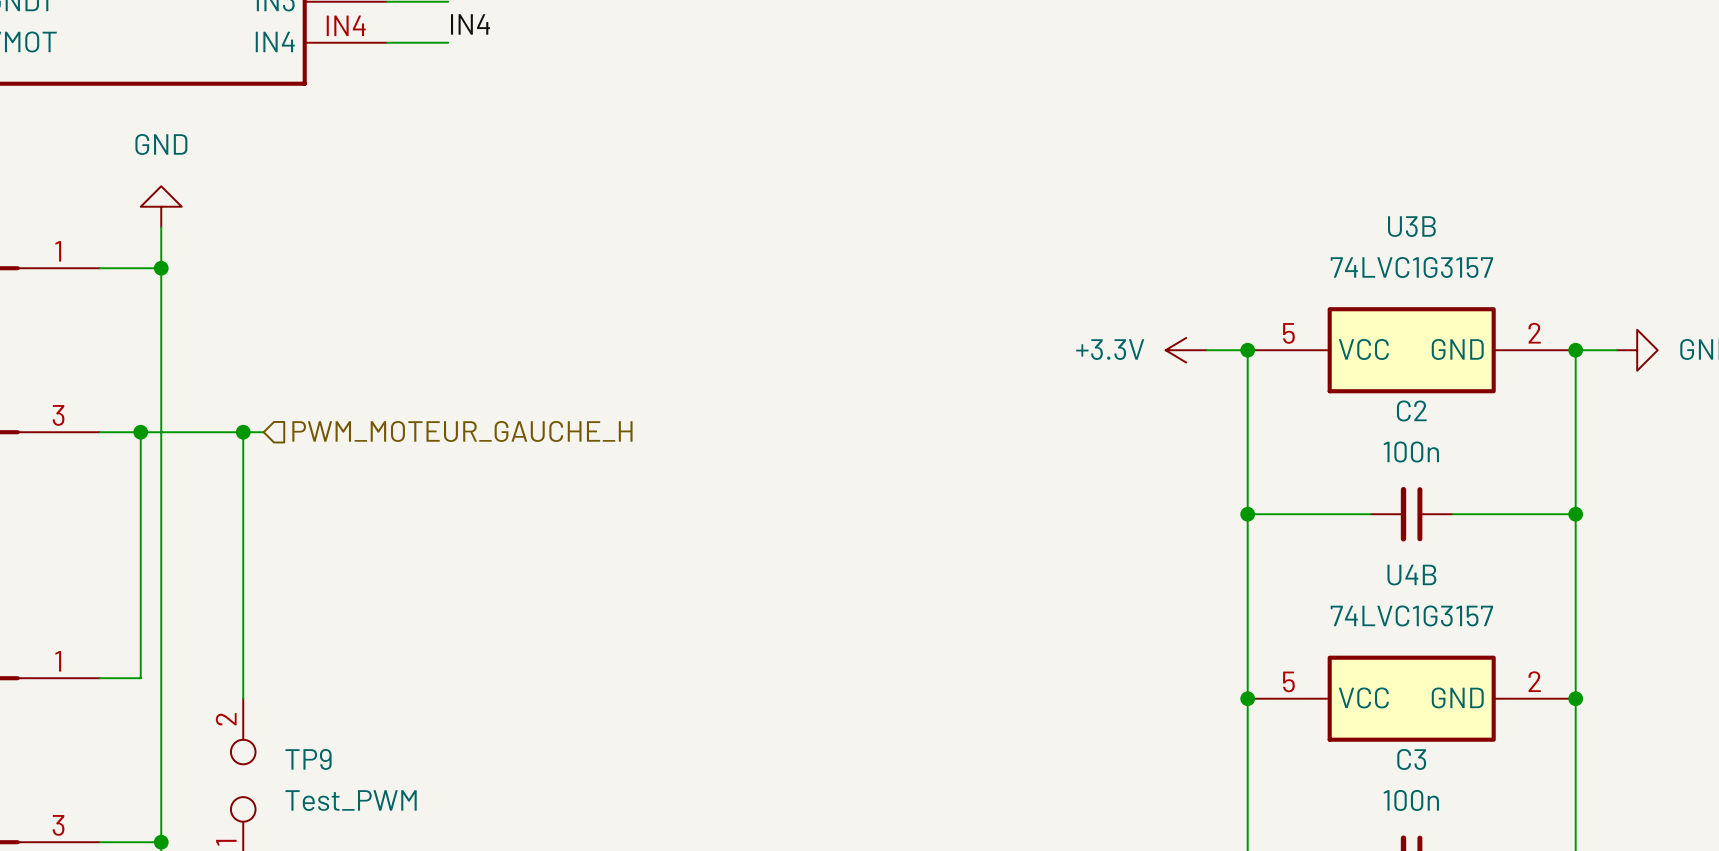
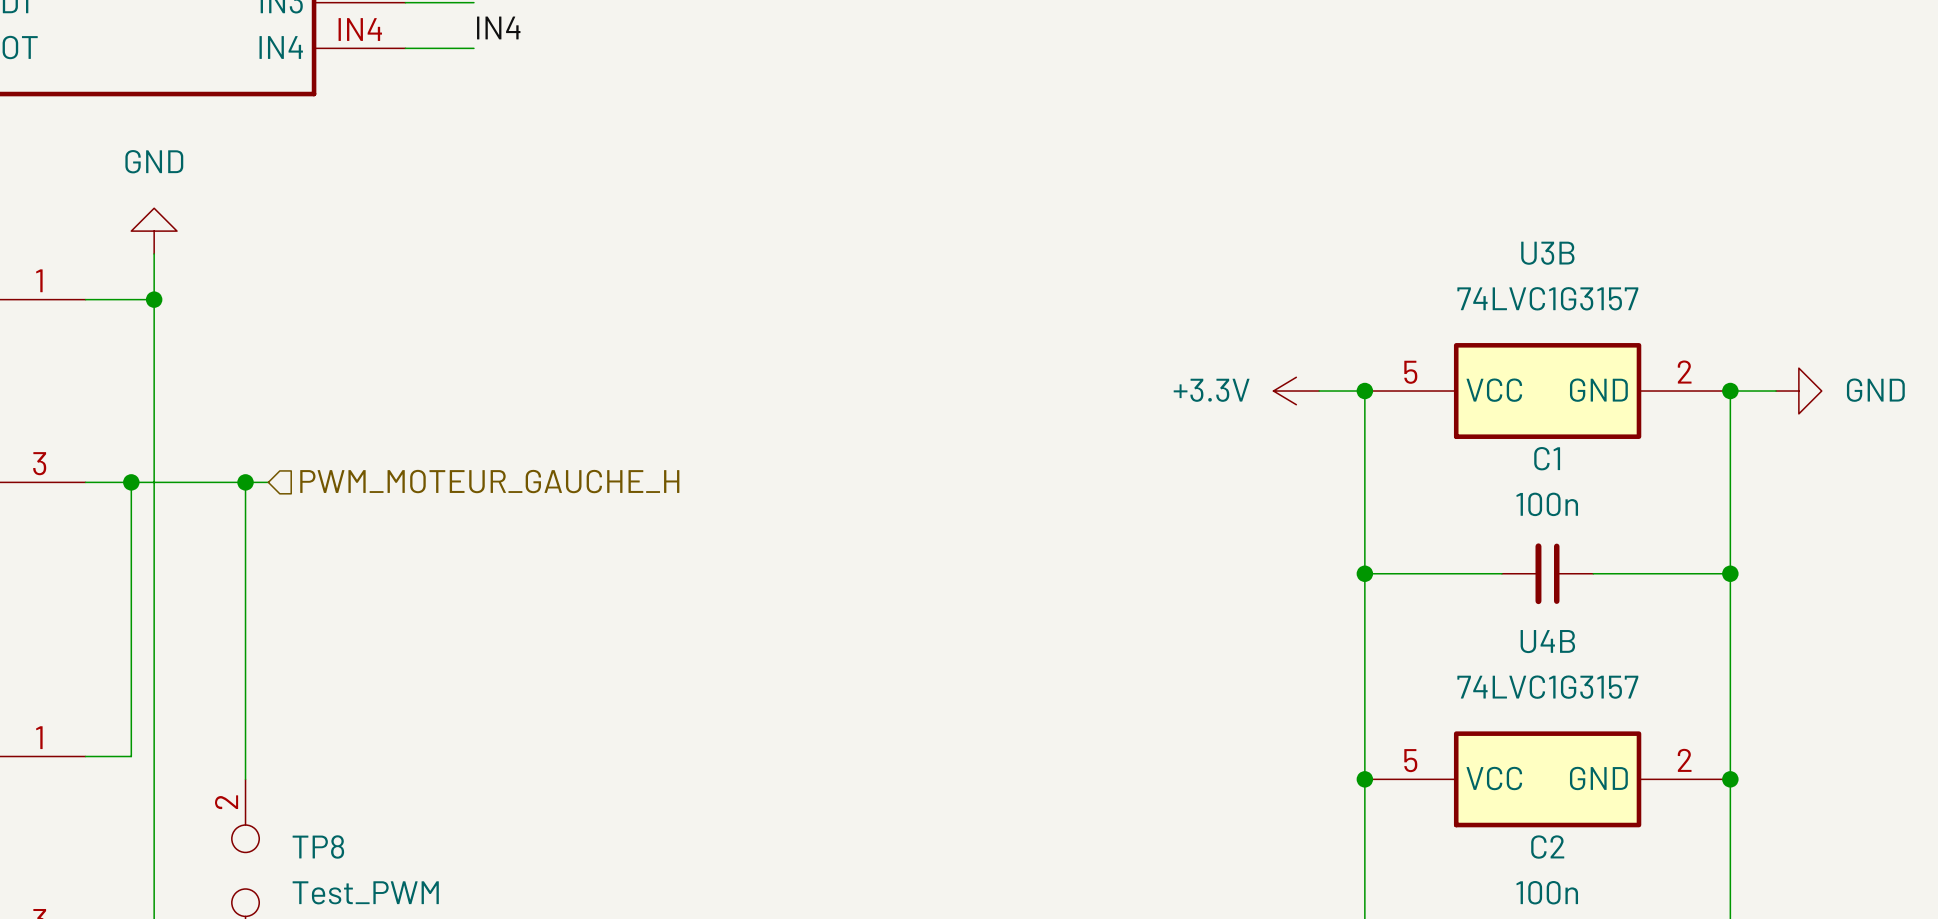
C2 name: C2 (1411, 410) -> C1 (1547, 458)
TP9 name: TP9 (308, 759) -> TP8 (318, 846)
C3 name: C3 (1411, 759) -> C2 (1547, 847)

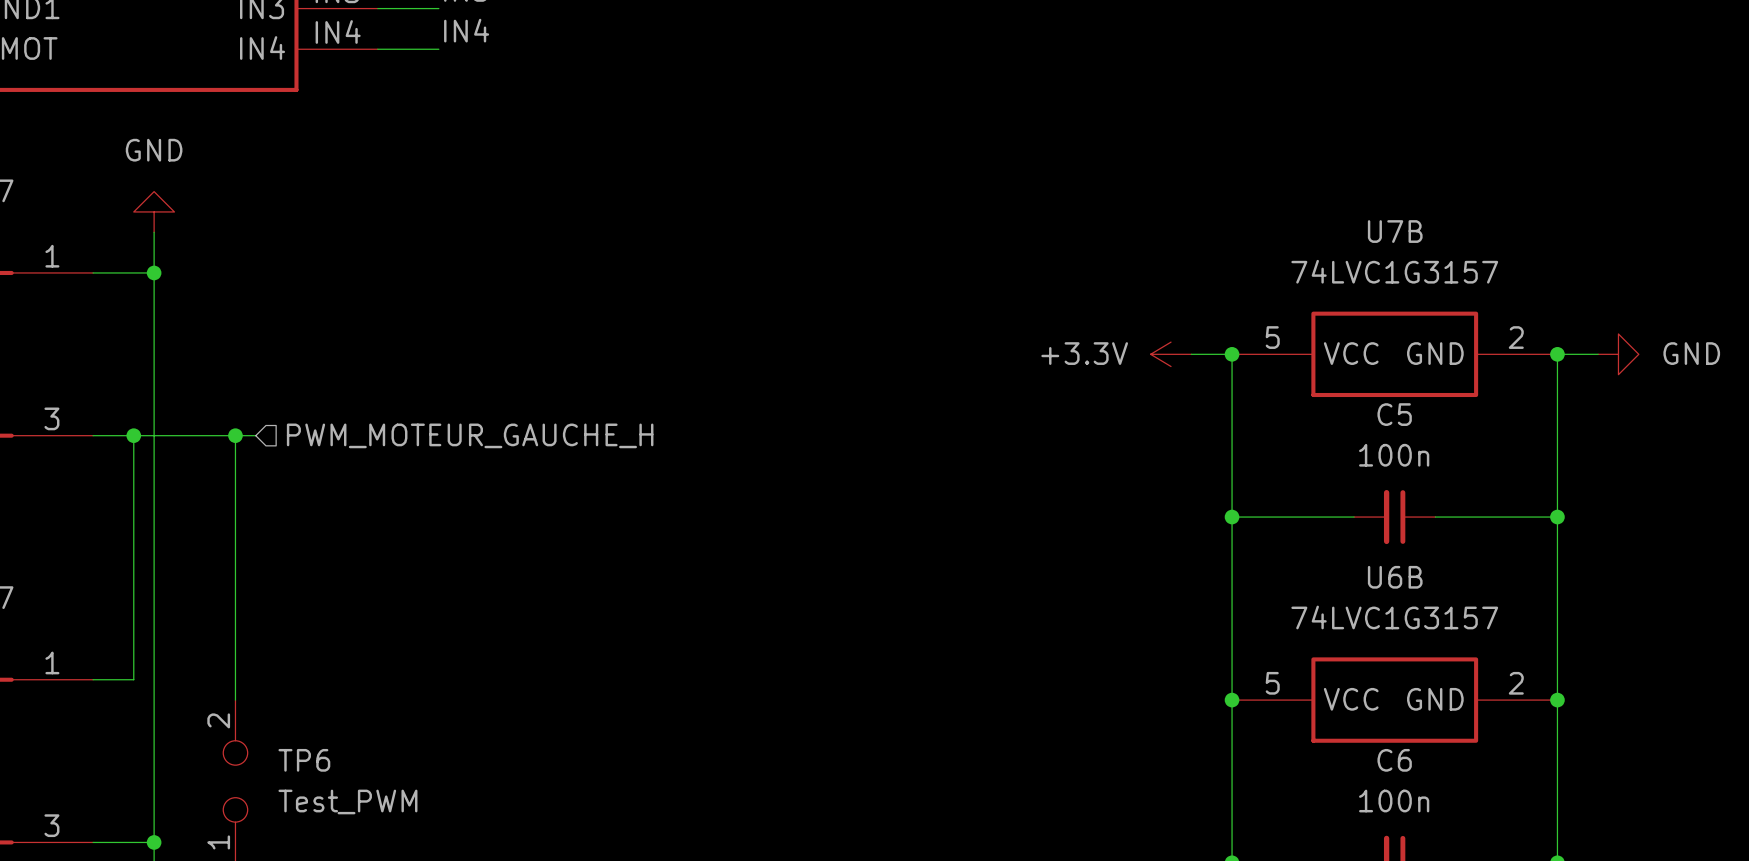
U3B name: U3B (1547, 253) -> U7B (1395, 231)
C1 name: C1 (1547, 458) -> C5 (1394, 414)
U4B name: U4B (1547, 641) -> U6B (1395, 577)
TP8 name: TP8 (318, 846) -> TP6 (304, 760)
C2 name: C2 (1547, 847) -> C6 (1394, 760)

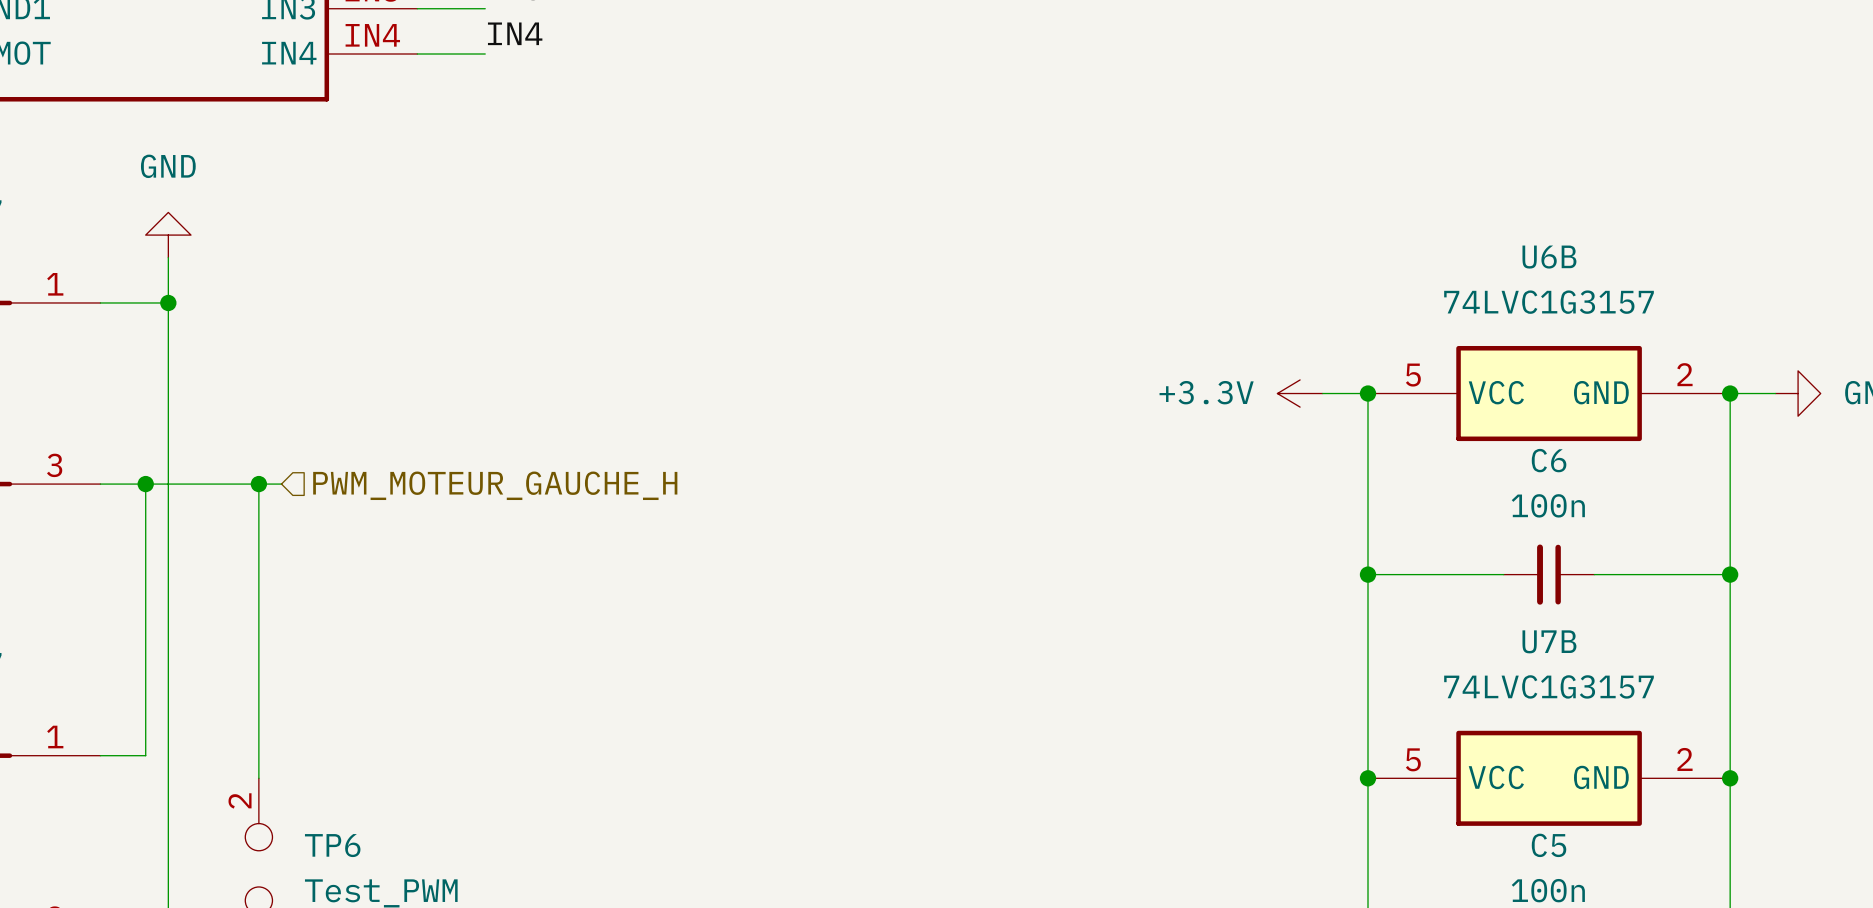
U7B name: U7B (1395, 231) -> U6B (1549, 257)
C5 name: C5 (1394, 414) -> C6 (1549, 460)
U6B name: U6B (1395, 577) -> U7B (1549, 641)
C6 name: C6 (1394, 760) -> C5 (1549, 845)

